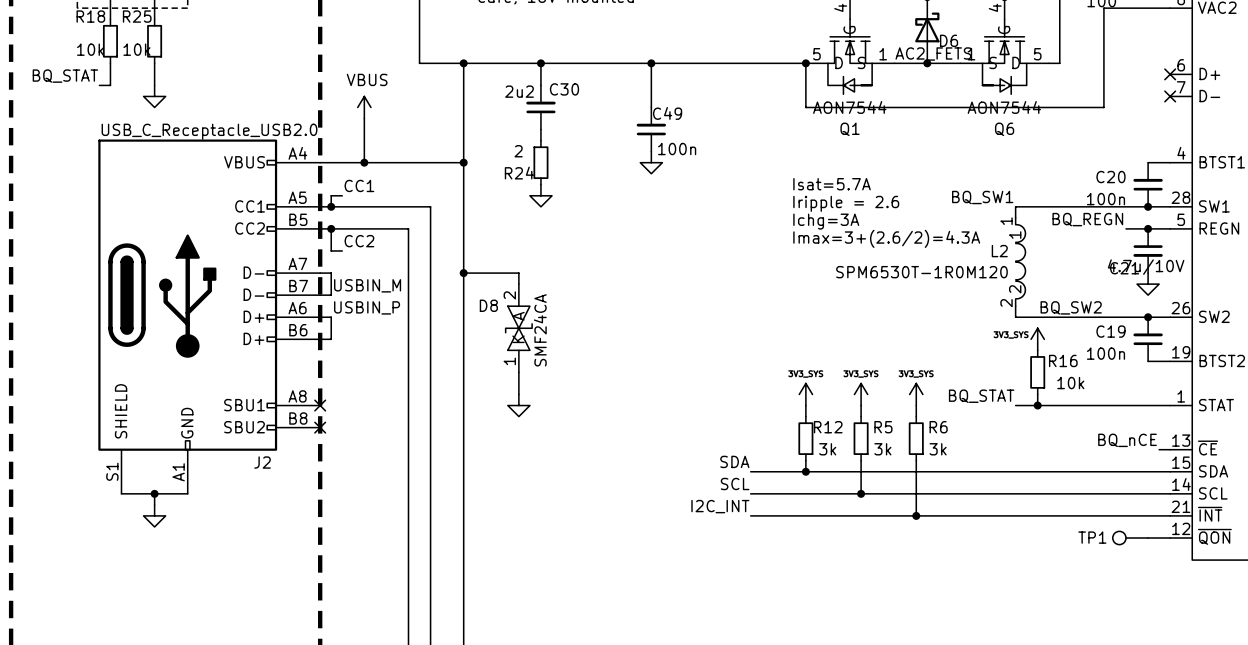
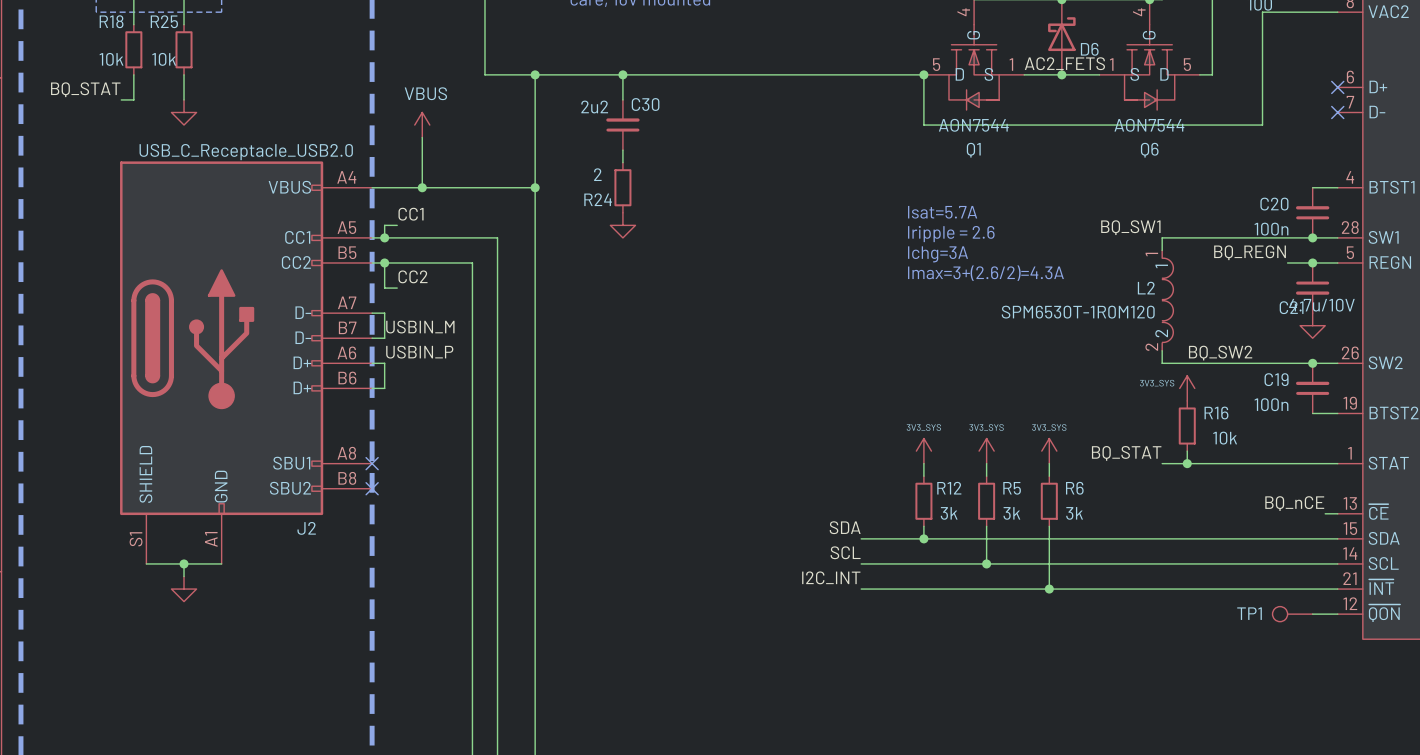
wire: (651, 63) (651, 107) -> none
junction: (651, 63) -> none
C49: 100n (651, 129) -> none
power symbol: (651, 162) -> none
wire: (463, 273) (518, 273) (518, 284) -> none
junction: (463, 273) -> none
D8: SMF24CA (518, 328) -> none
wire: (518, 372) (518, 394) -> none
power symbol: (518, 405) -> none

